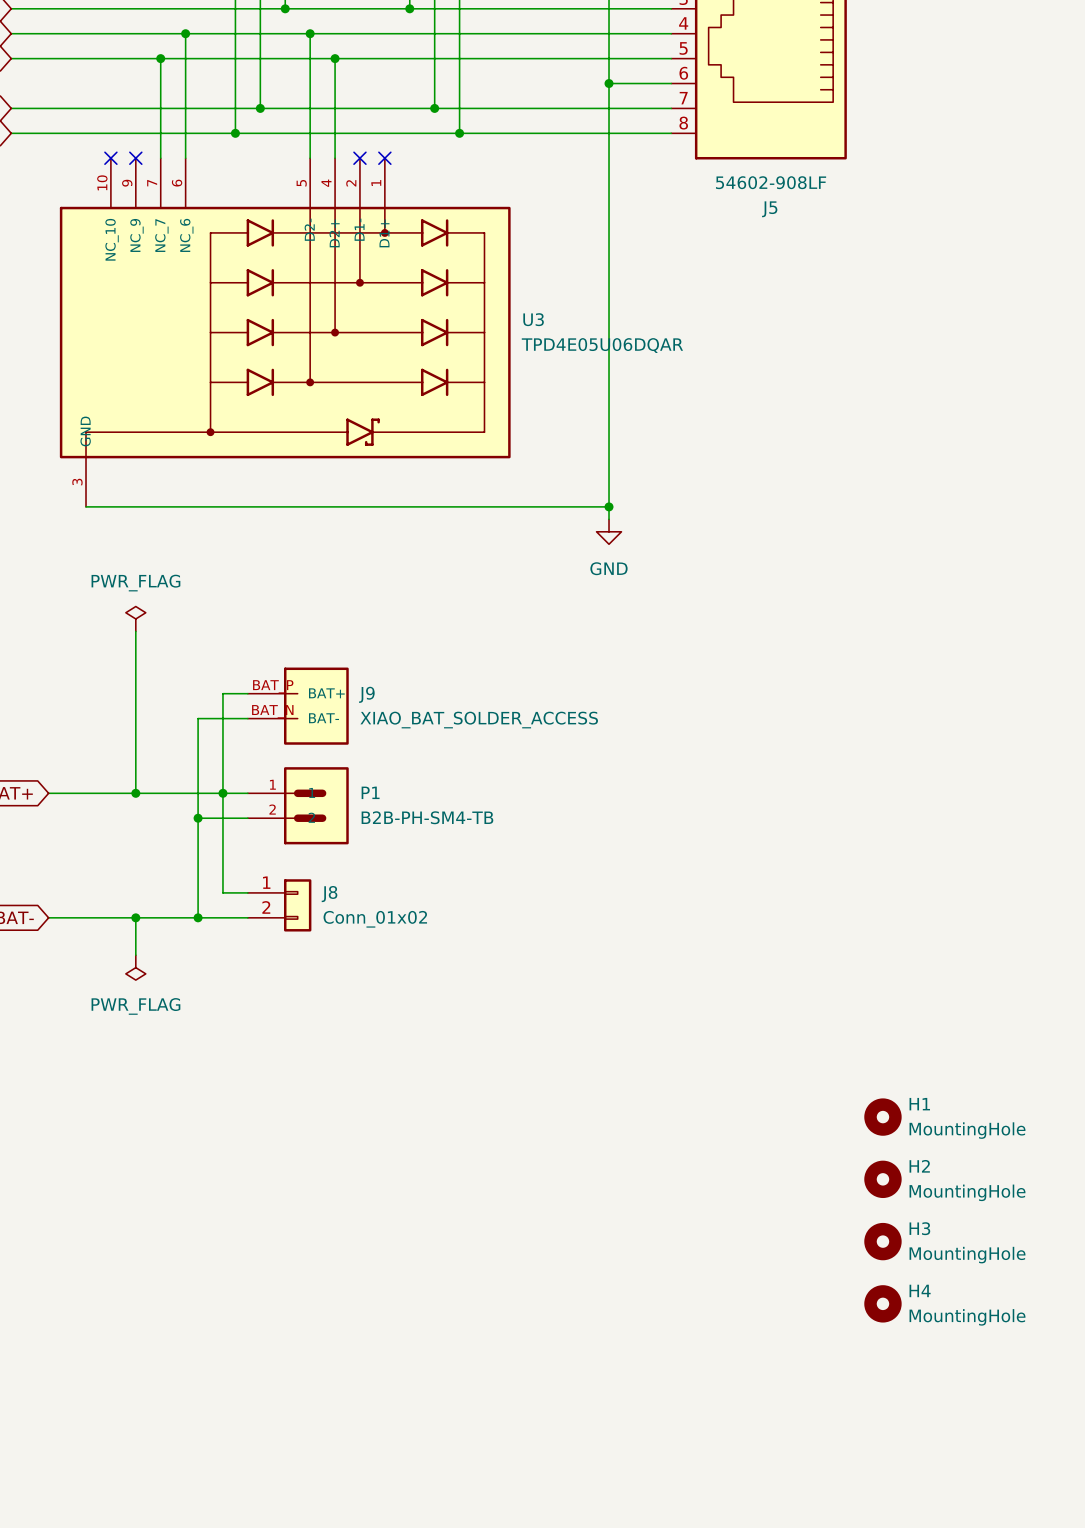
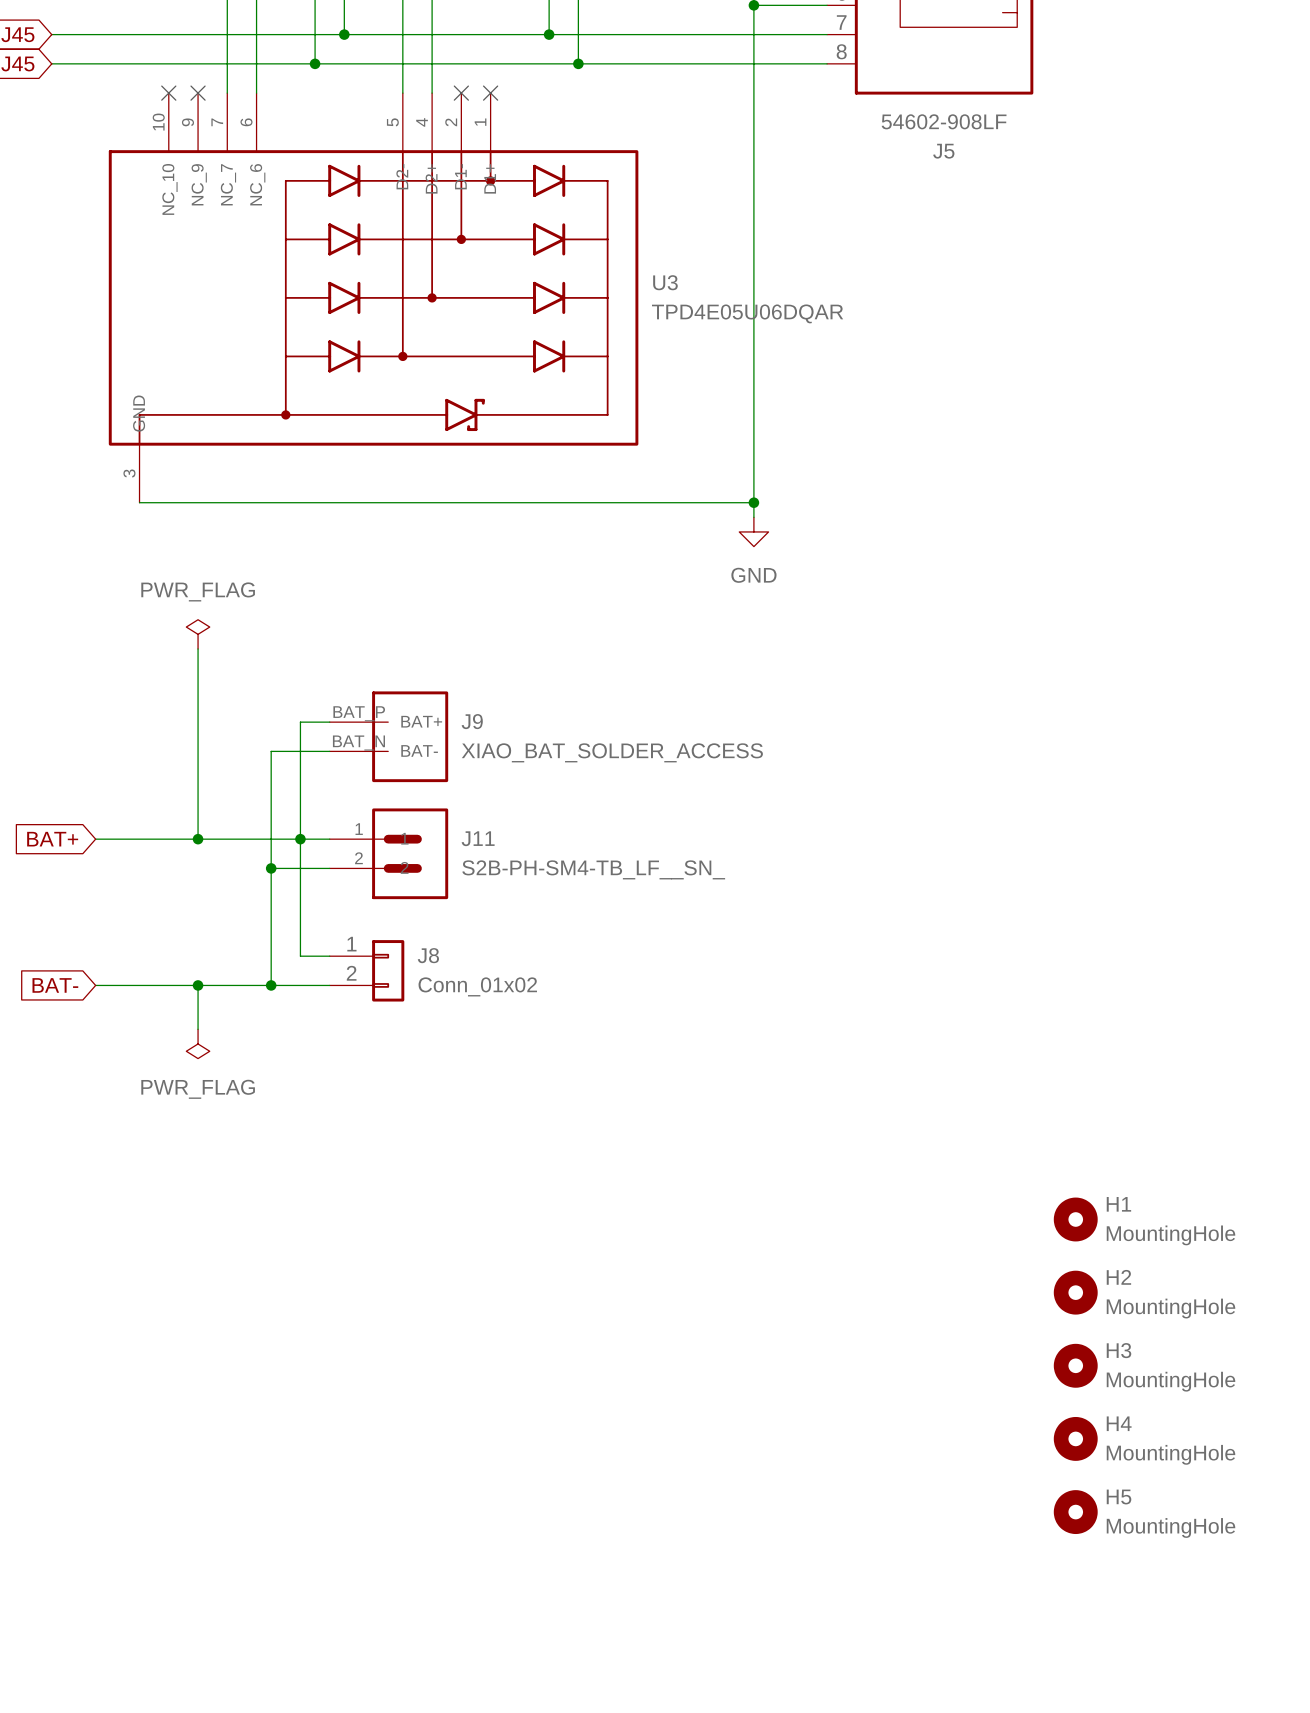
P1 name: P1 (370, 792) -> J11 (478, 838)
P1 value: B2B-PH-SM4-TB (427, 817) -> S2B-PH-SM4-TB_LF__SN_ (593, 869)
H5: none -> MountingHole (1075, 1512)

